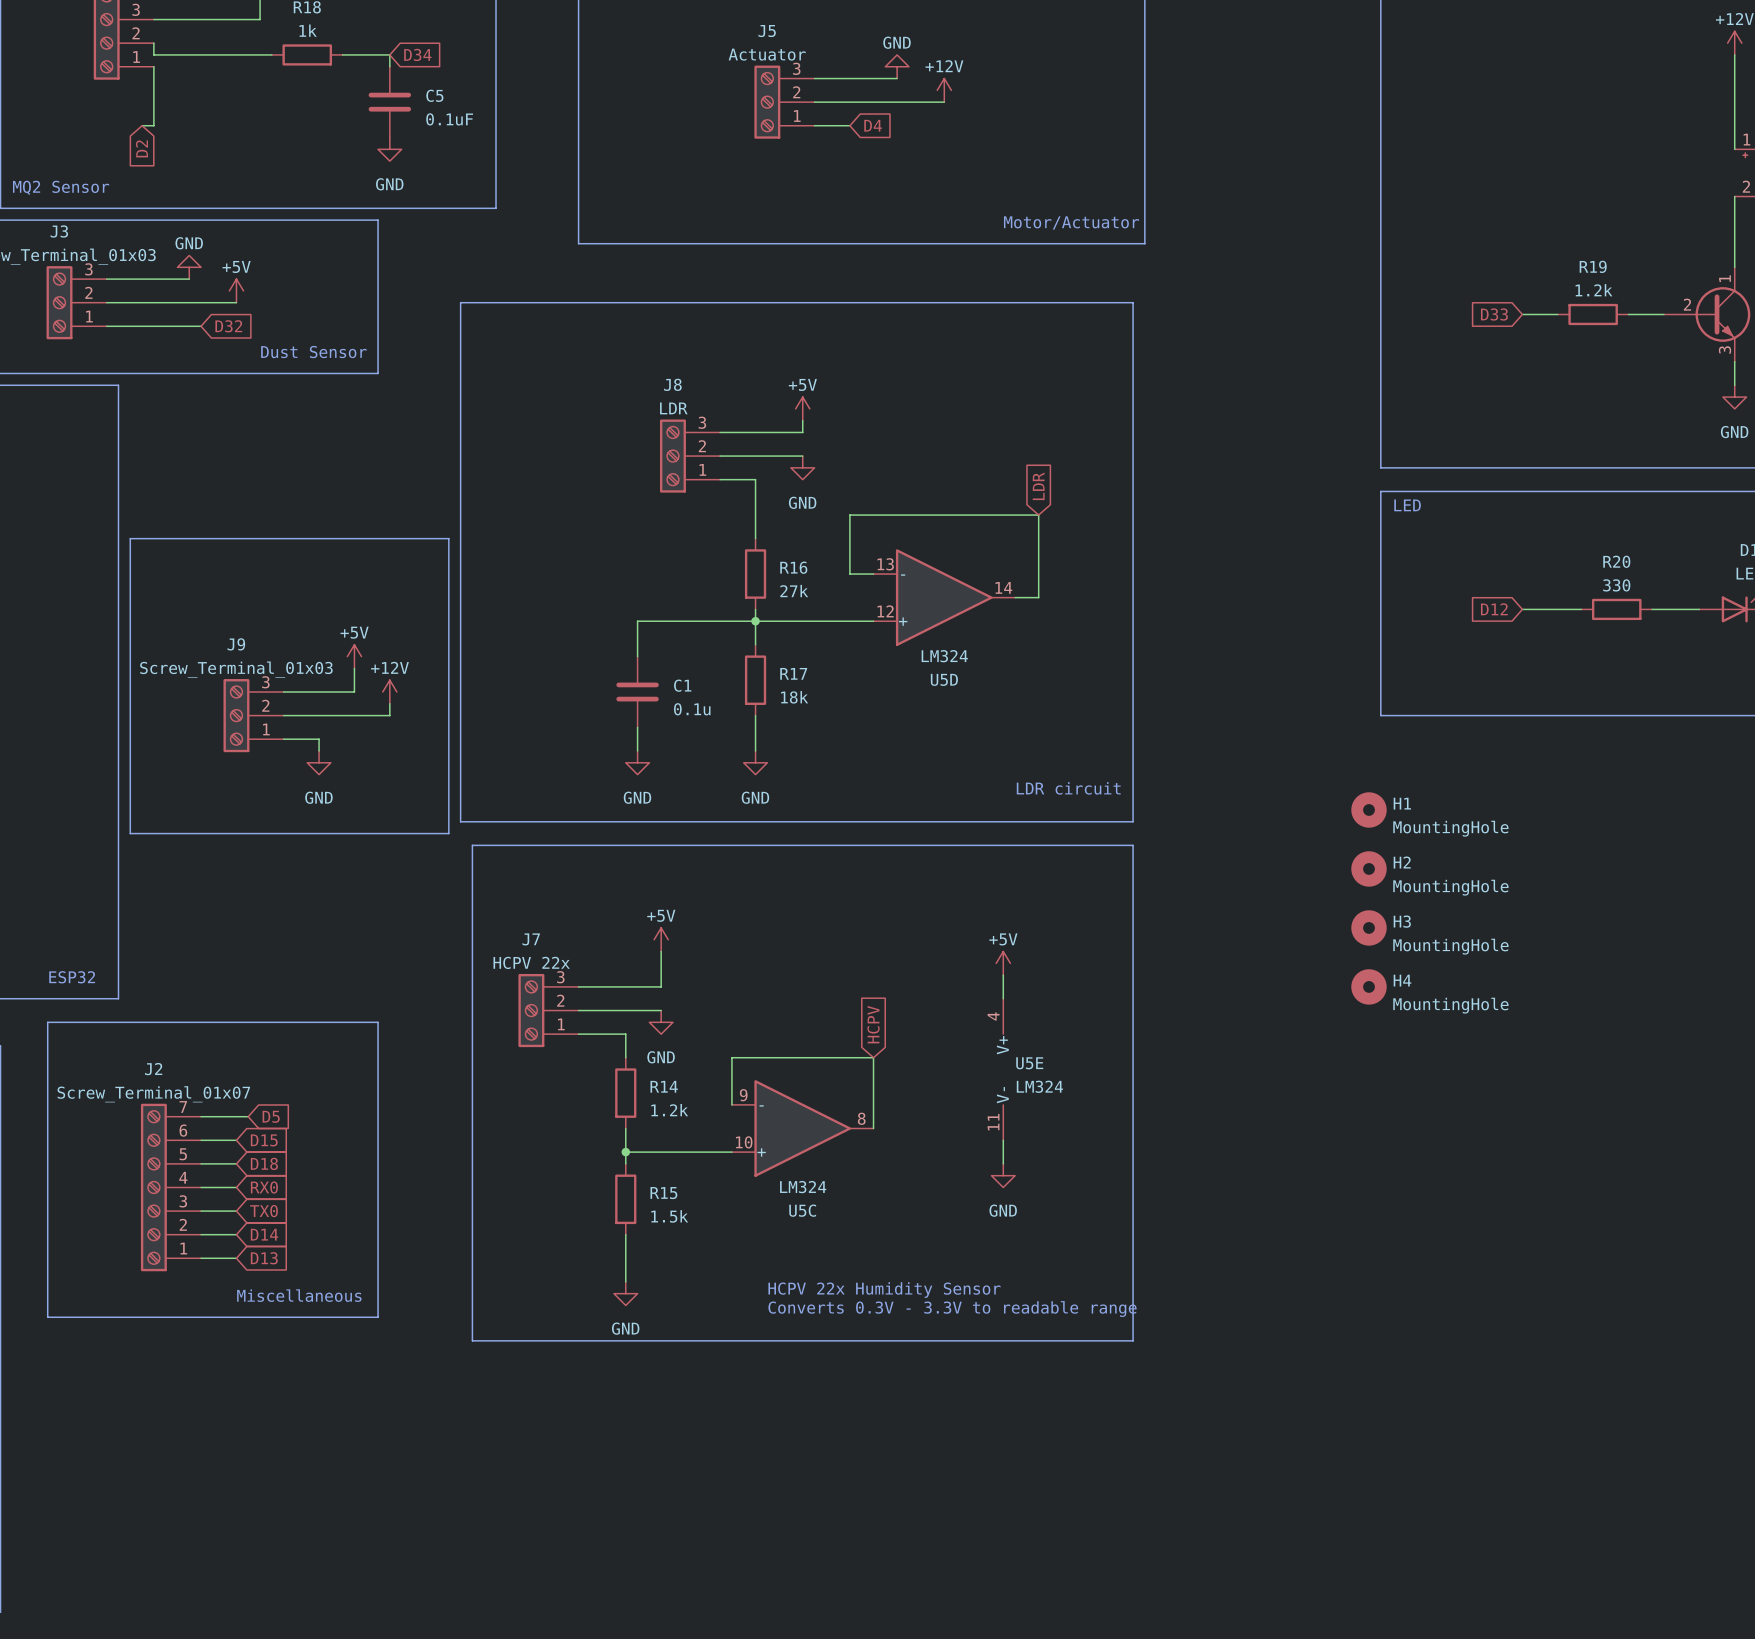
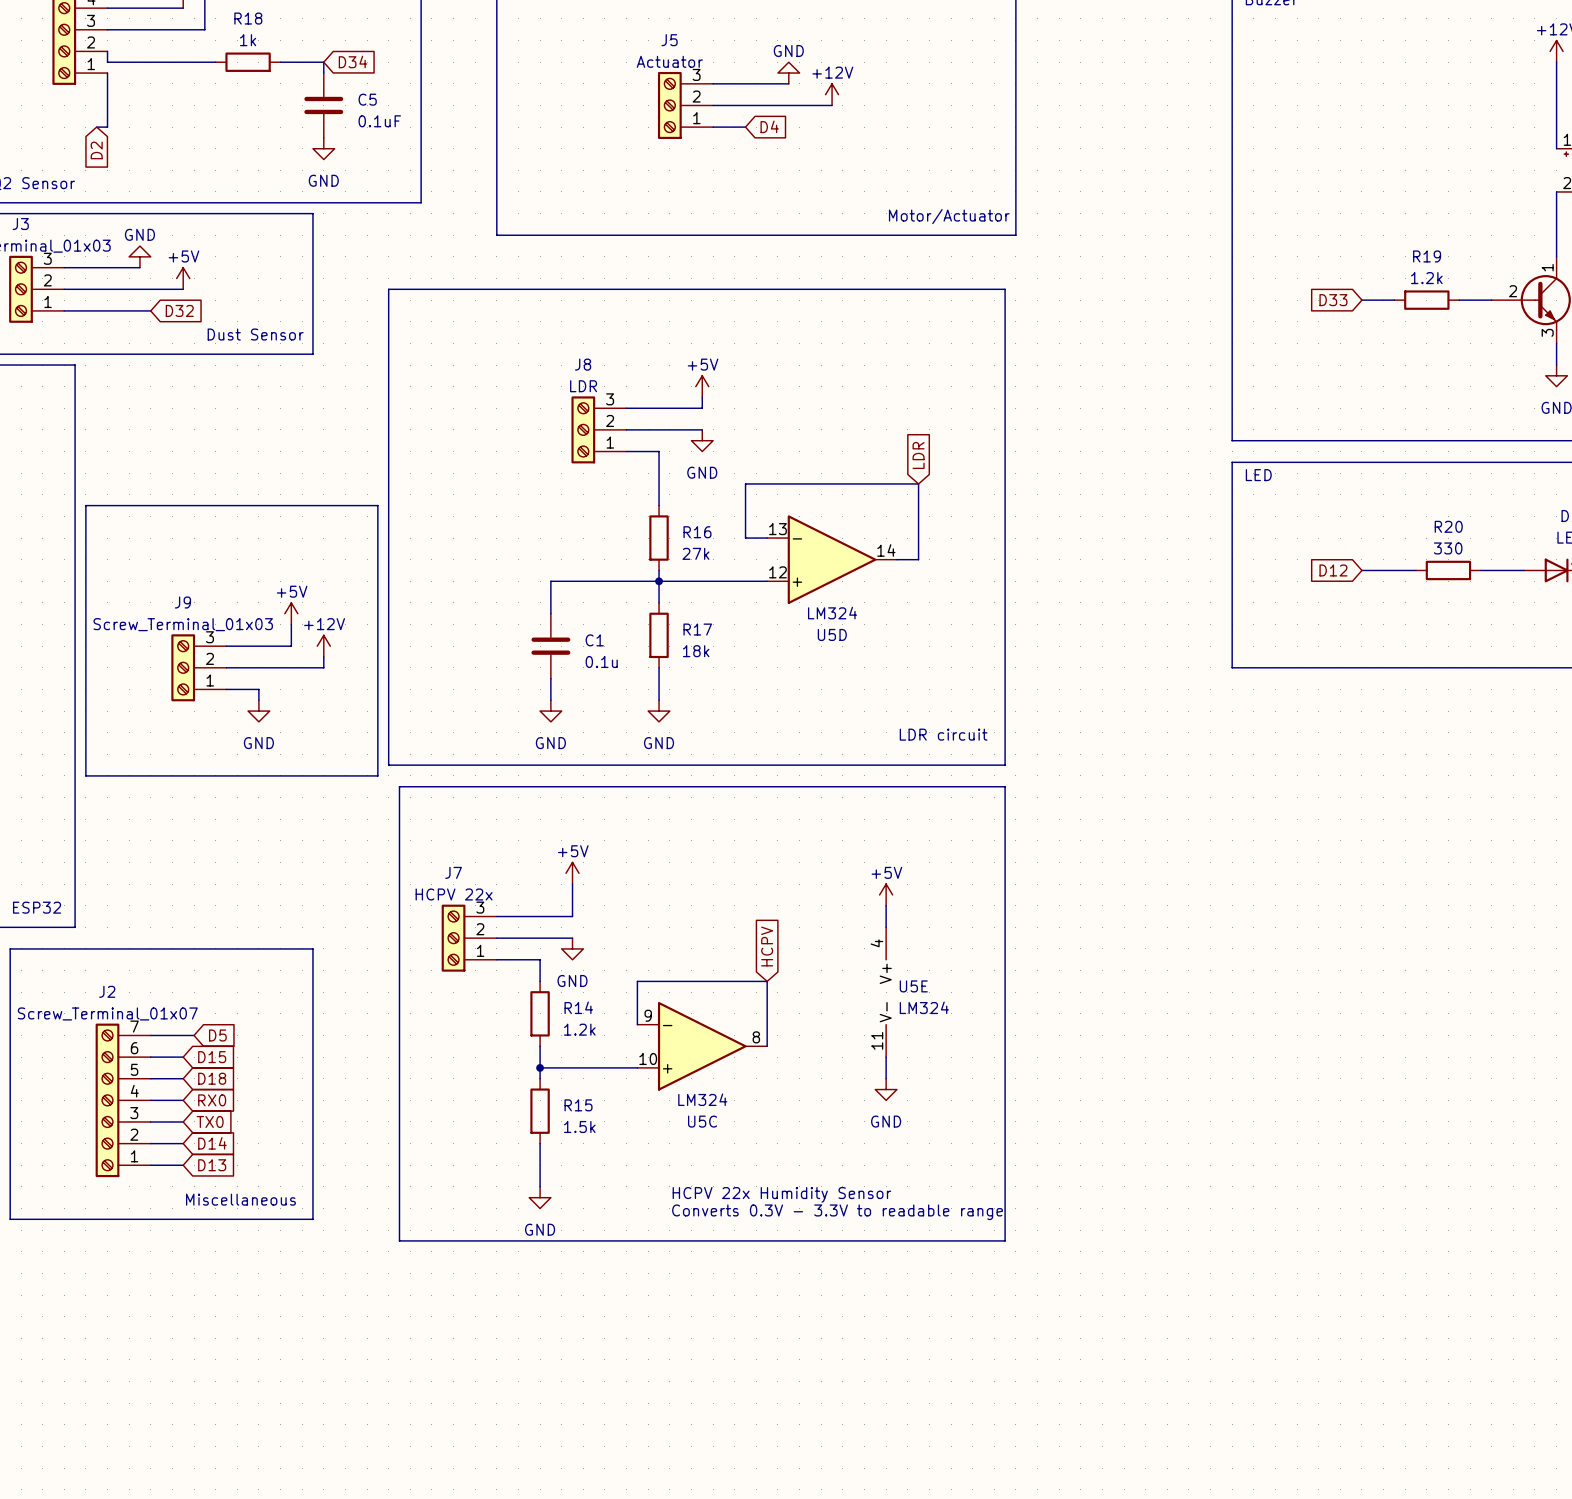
H1: MountingHole (1369, 809) -> none
H2: MountingHole (1369, 868) -> none
H3: MountingHole (1369, 927) -> none
H4: MountingHole (1369, 986) -> none

